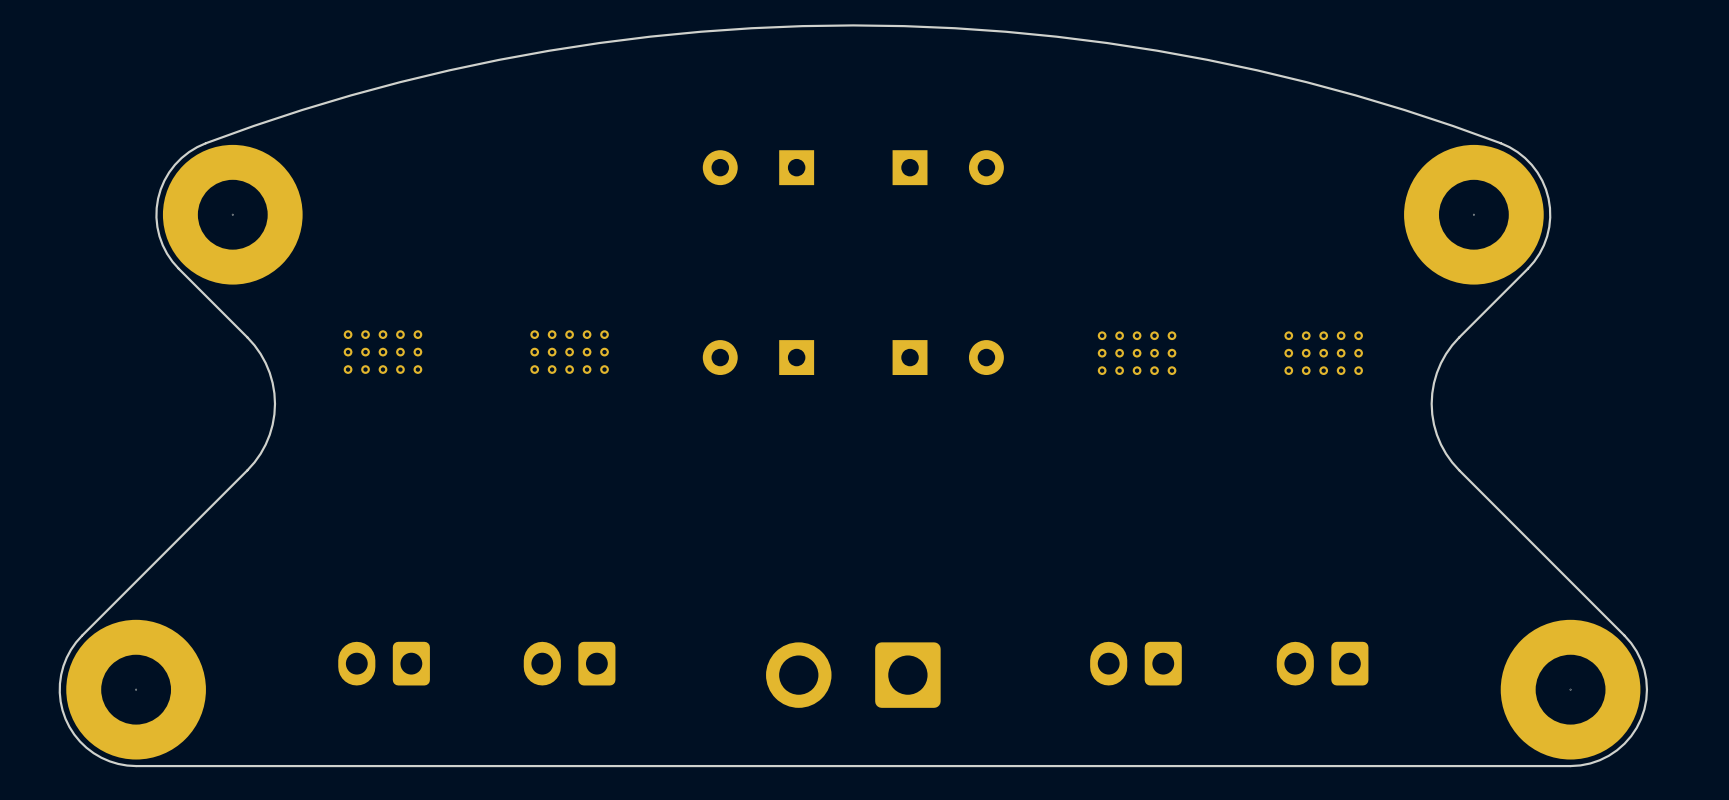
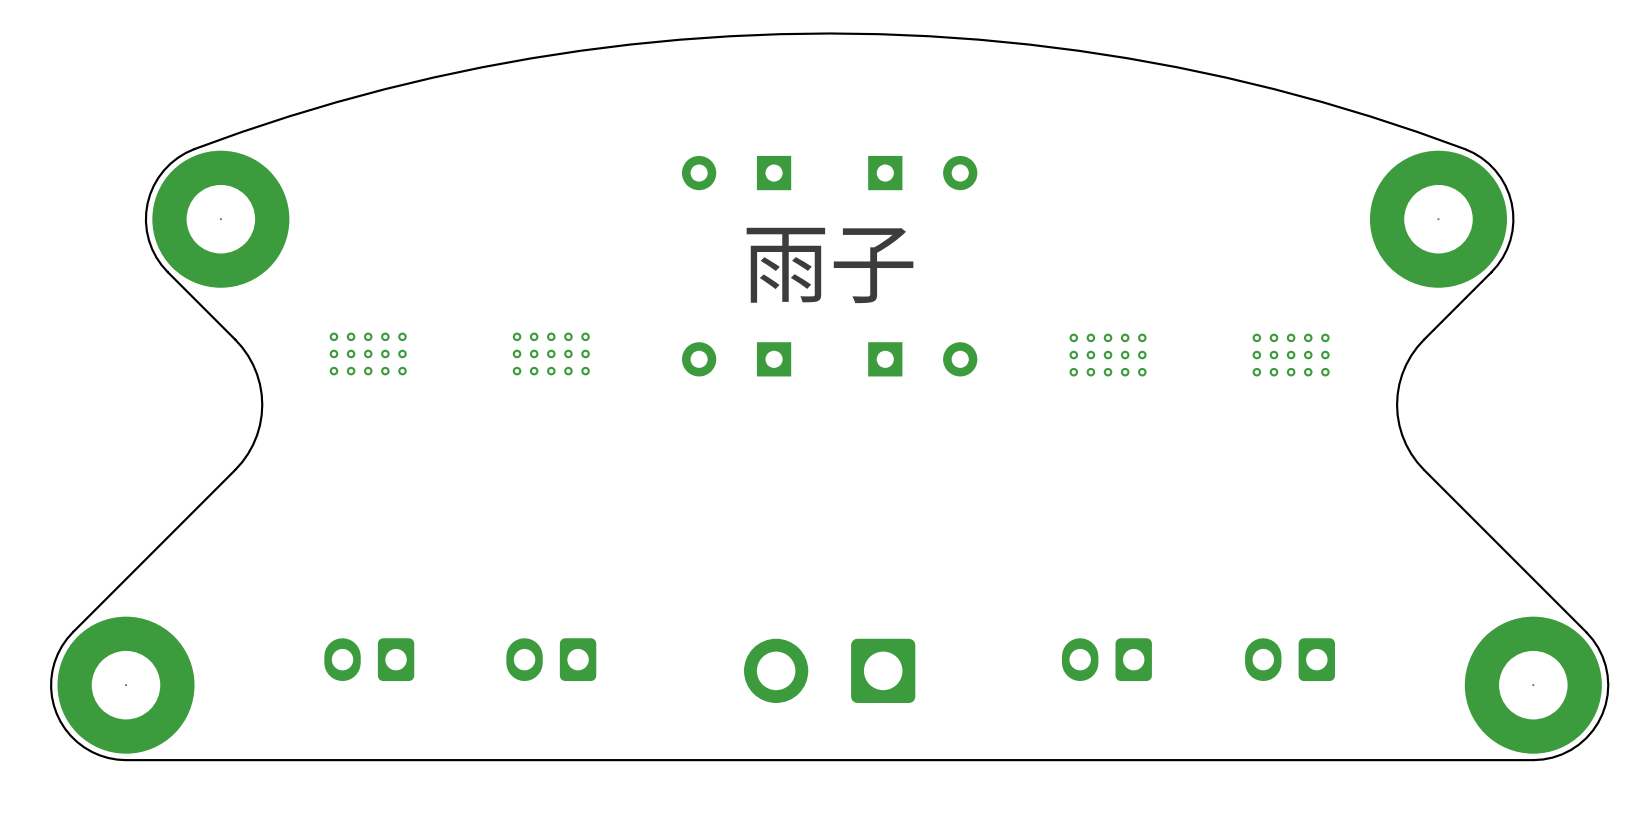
text: none -> 雨子 (830, 265)

